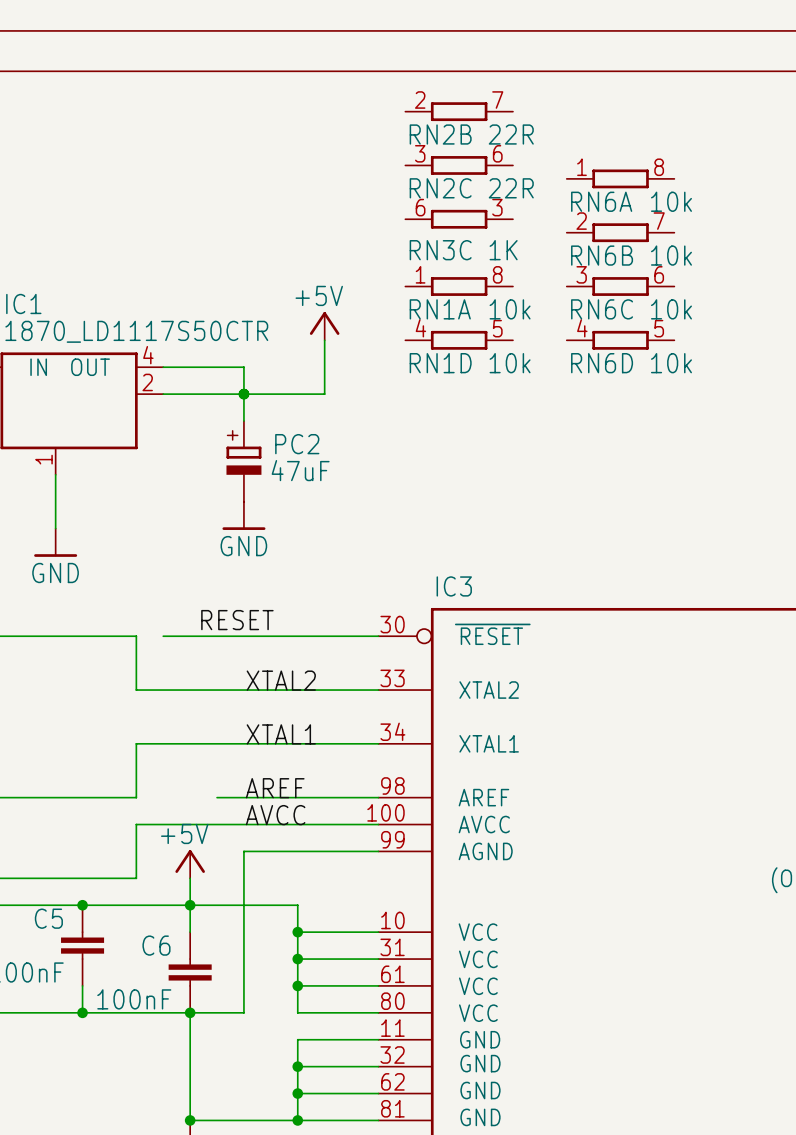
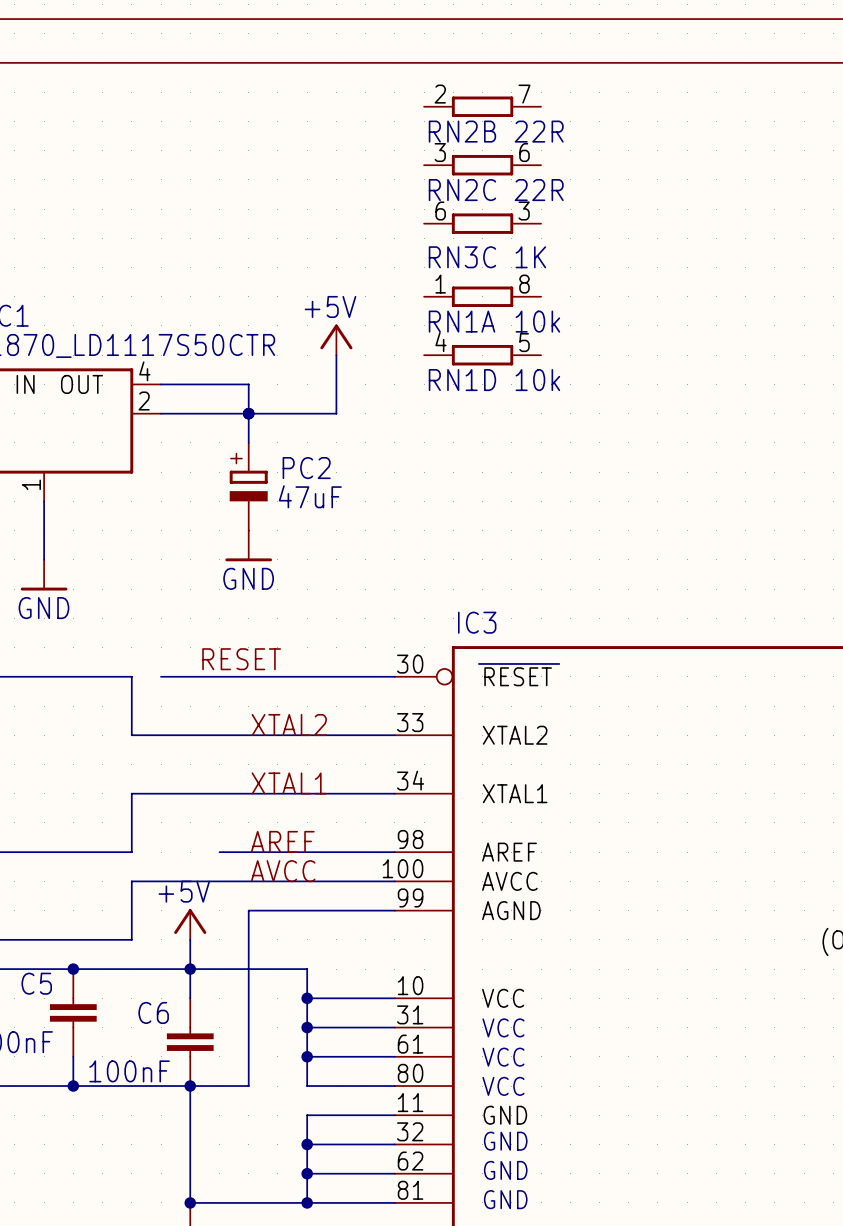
RN6A: 10k (620, 178) -> none
RN6B: 10k (620, 232) -> none
RN6C: 10k (620, 286) -> none
RN6D: 10k (620, 340) -> none

